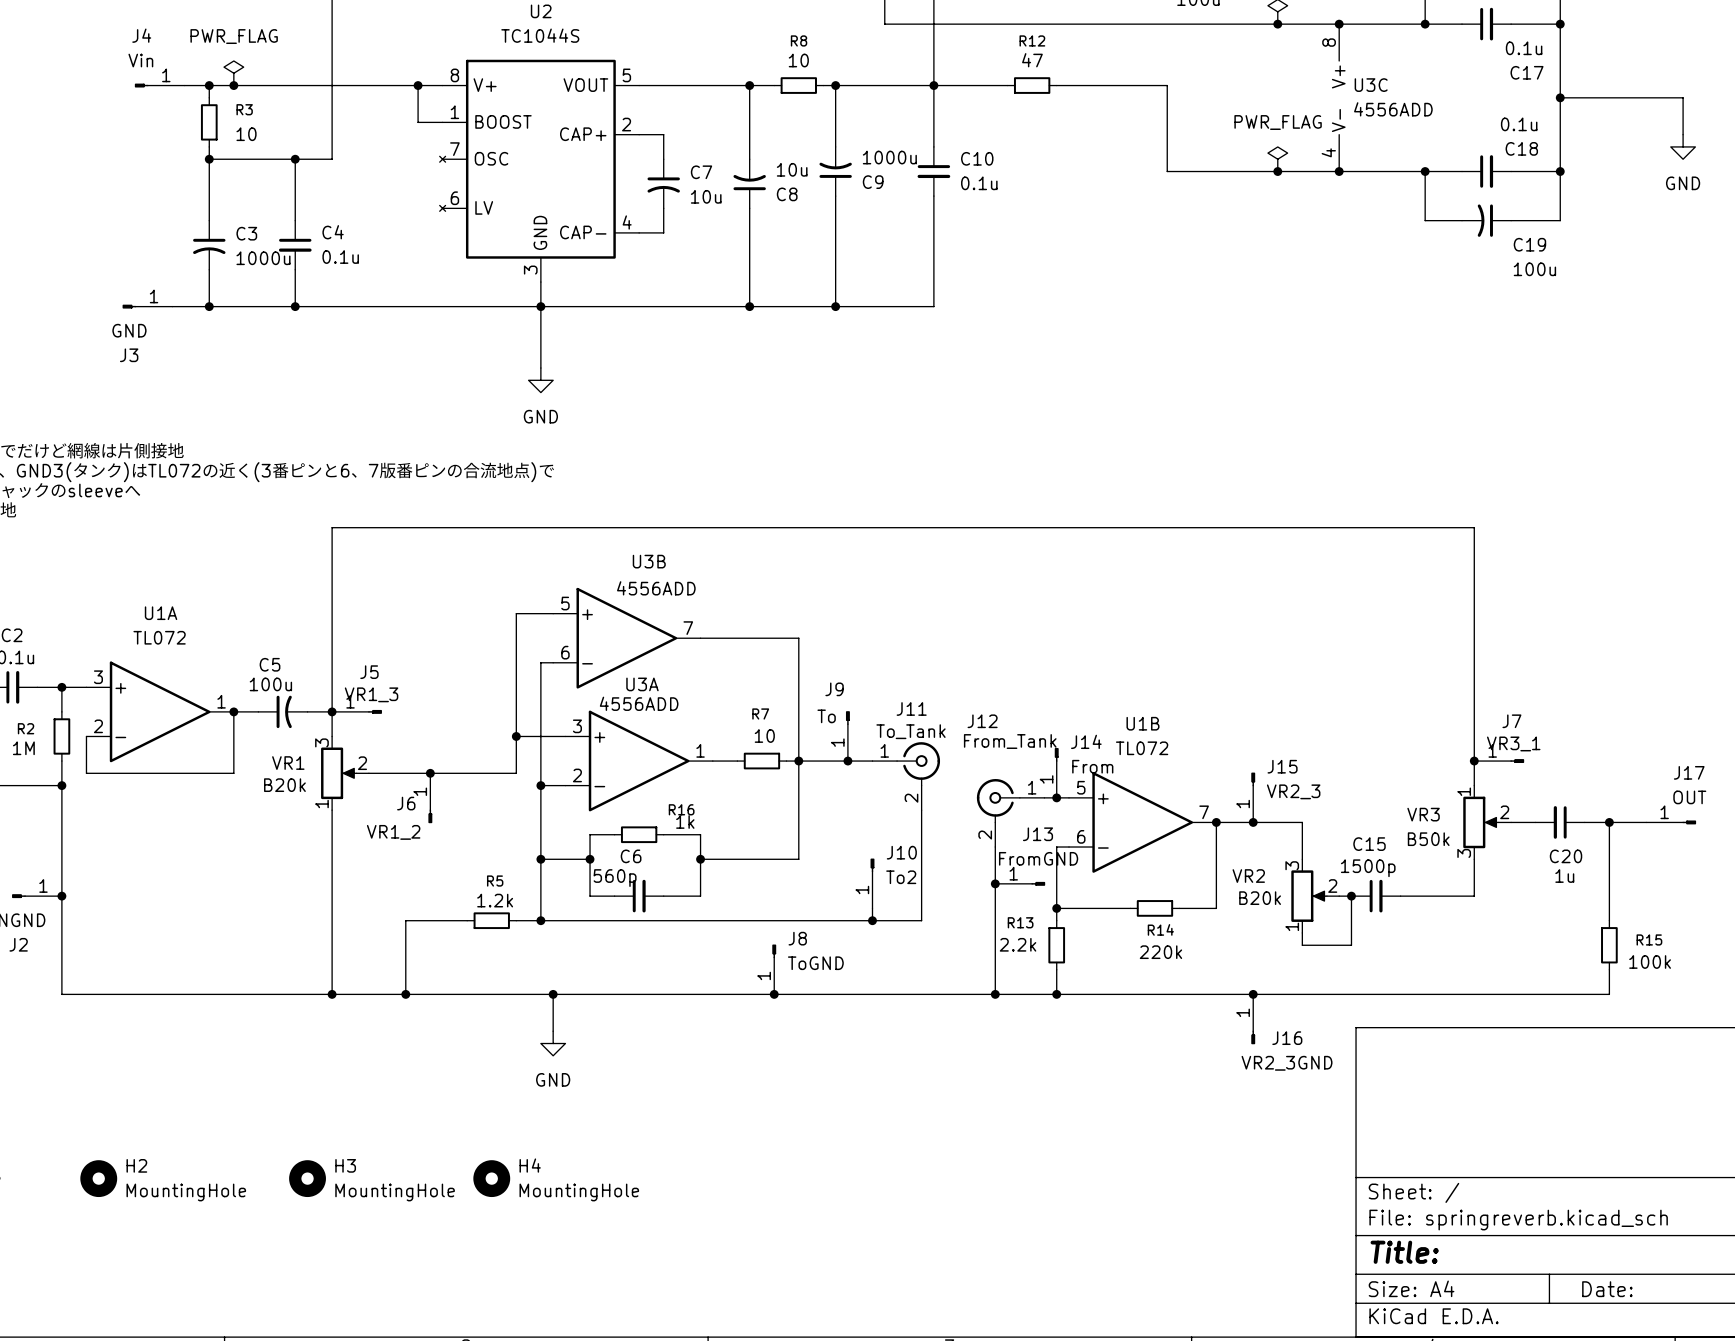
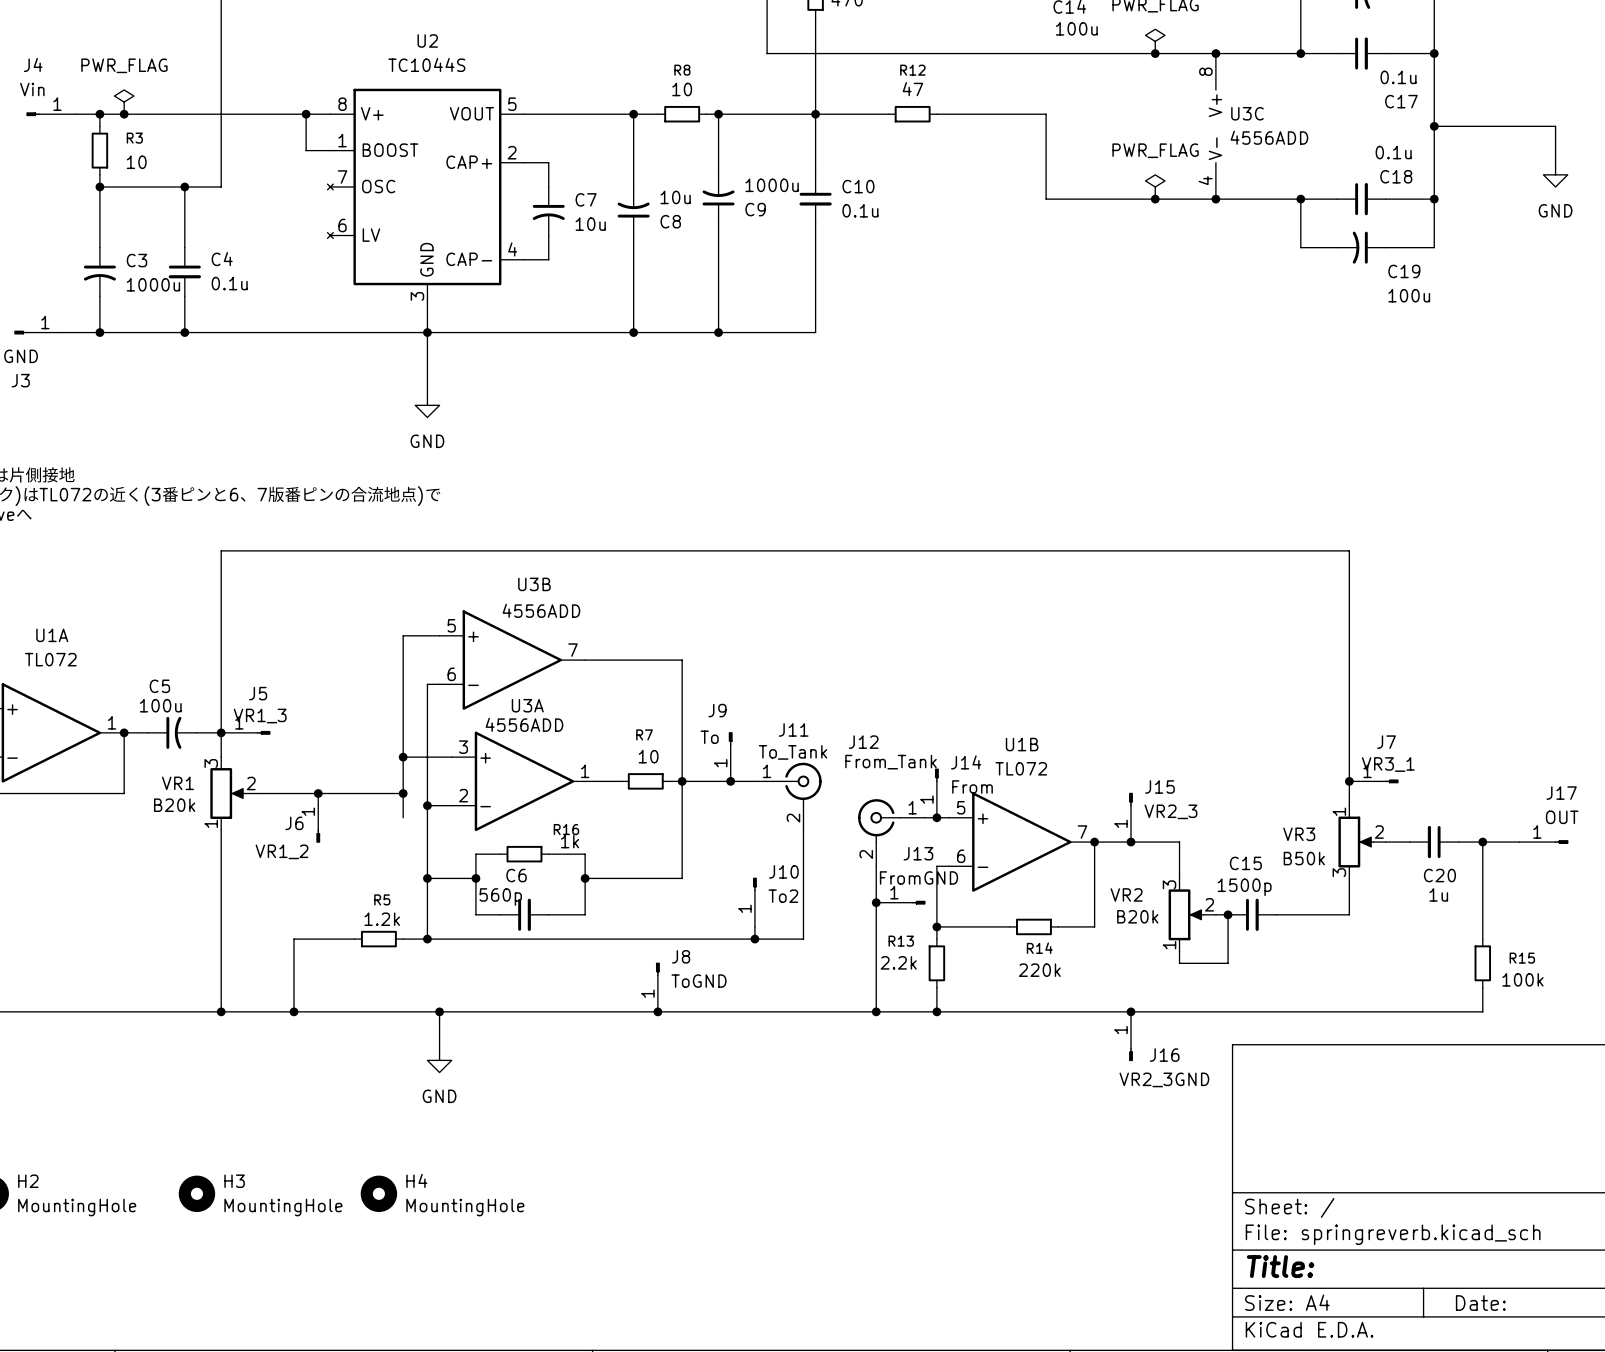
wire: none -> (403, 793) (403, 817)
junction: none -> (403, 793)

